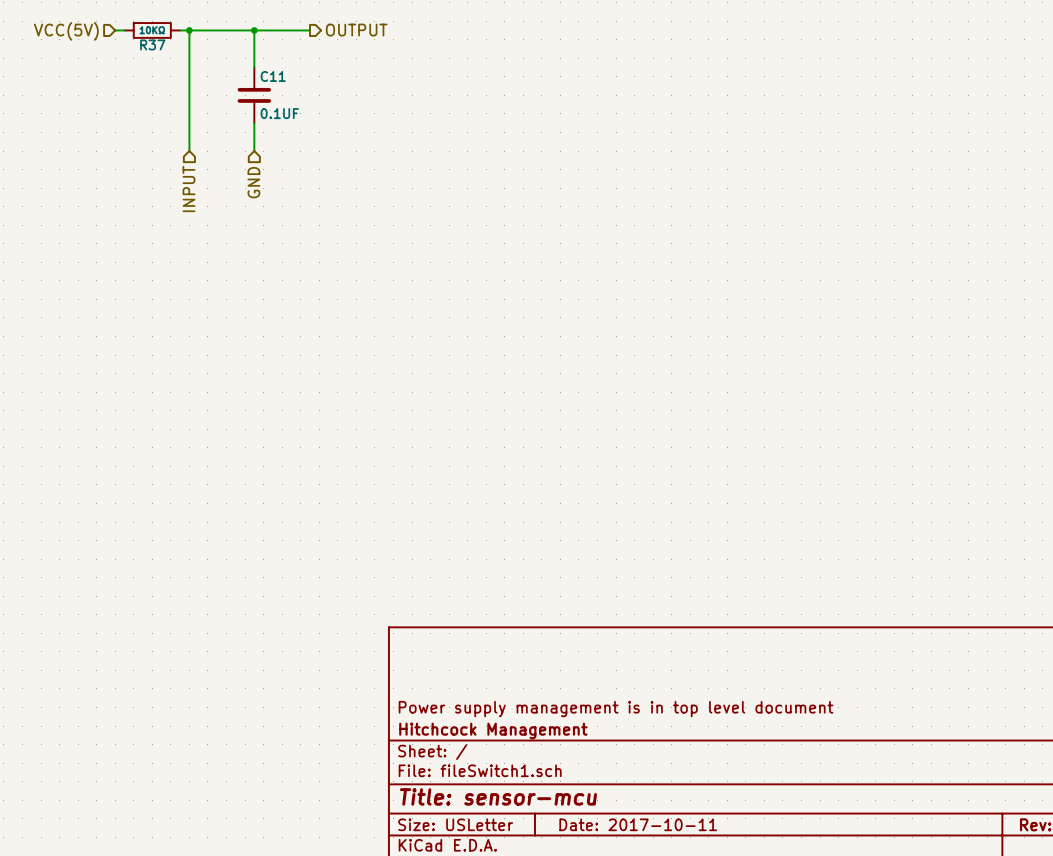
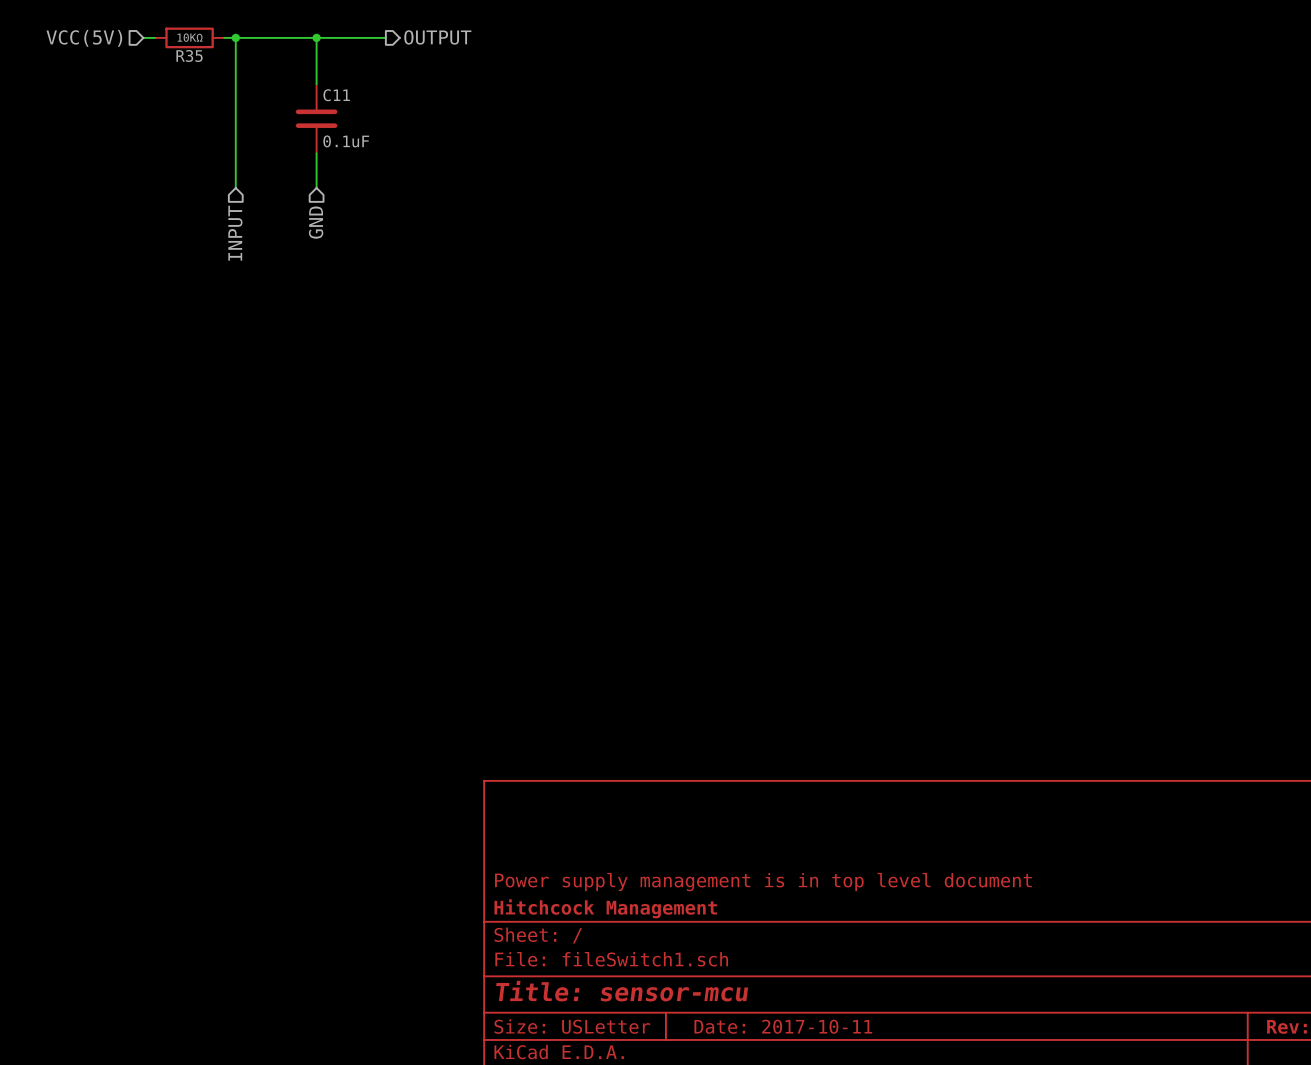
R37 name: R37 (152, 44) -> R35 (189, 55)
C11 value: 0.1UF (279, 113) -> 0.1uF (346, 141)

